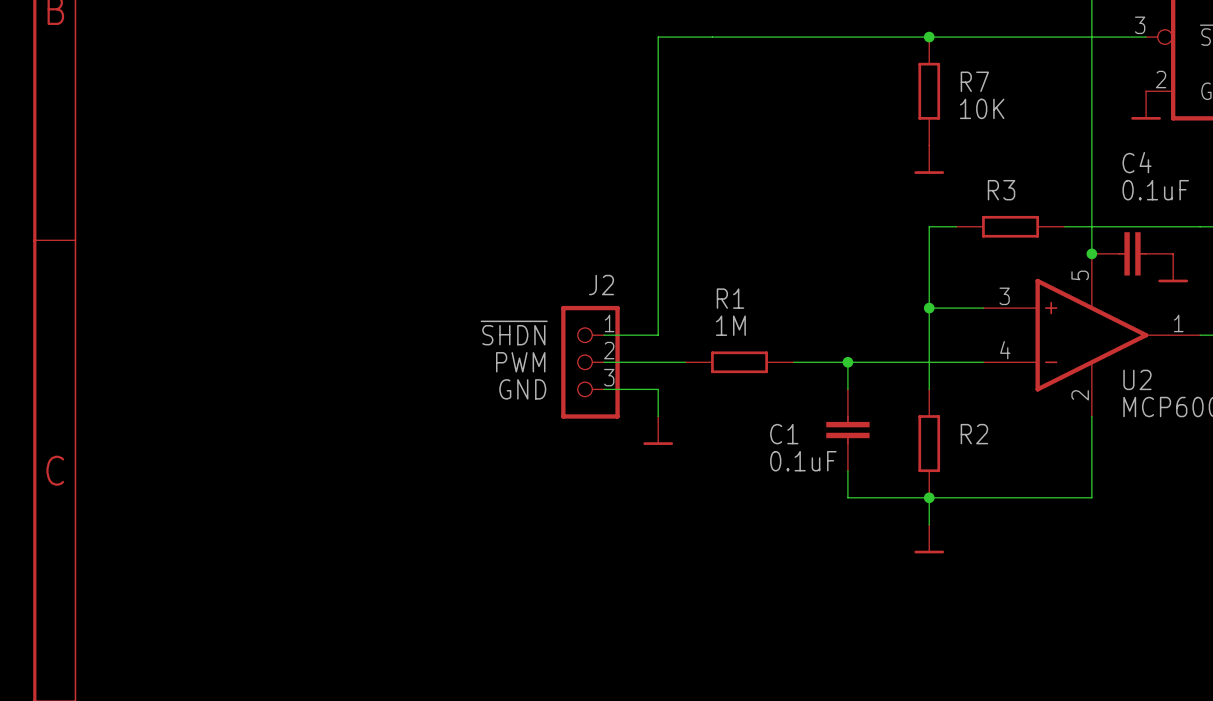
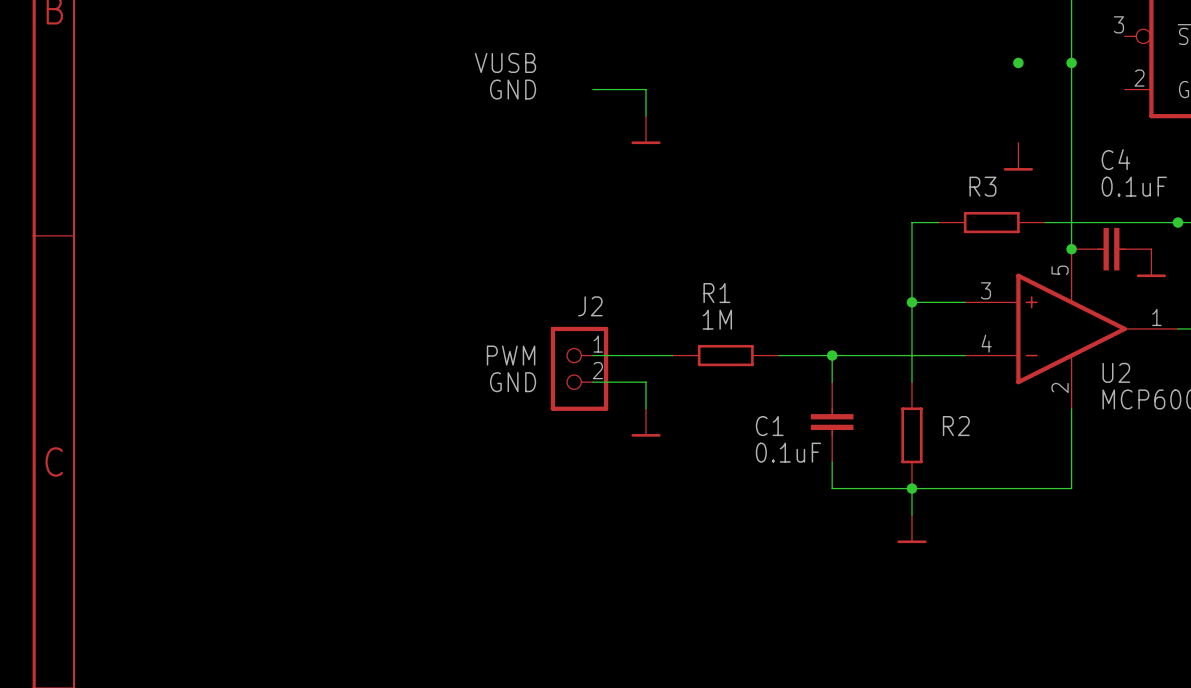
junction: (929, 37) -> none
wire: (1146, 37) (658, 37) (658, 91) -> (592, 89) (645, 89)
label: none -> VUSB (505, 62)
junction: none -> (1018, 62)
junction: none -> (1071, 62)
label: none -> GND (513, 89)
R7: 10K (929, 91) -> none
power symbol: (1146, 105) -> none
wire: (658, 118) (658, 335) (604, 335) -> none
power symbol: none -> (645, 130)
power symbol: (929, 159) -> none
power symbol: none -> (1018, 156)
junction: none -> (1177, 222)
J2 symbol: [561, 305, 620, 419] -> [550, 326, 609, 411]
label: ~{SHDN} (514, 333) -> none

